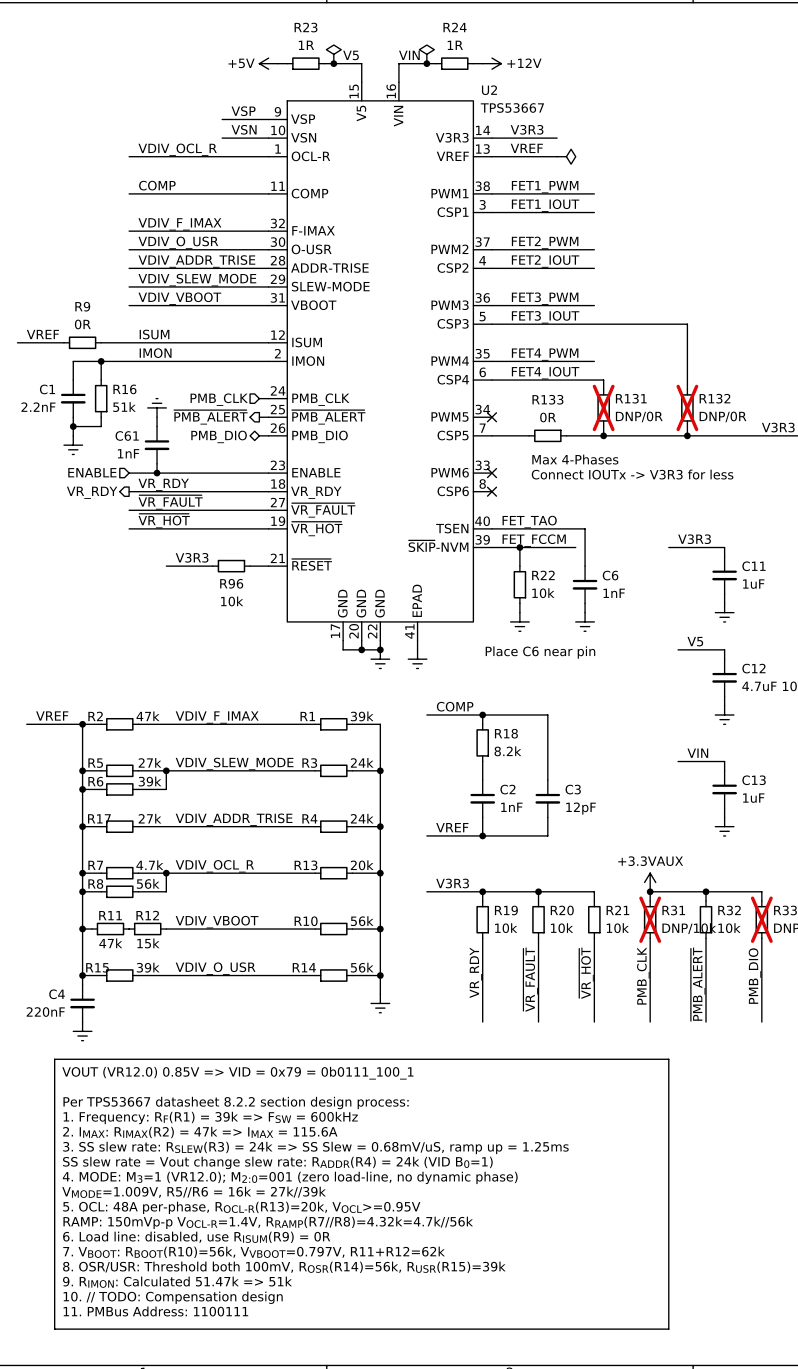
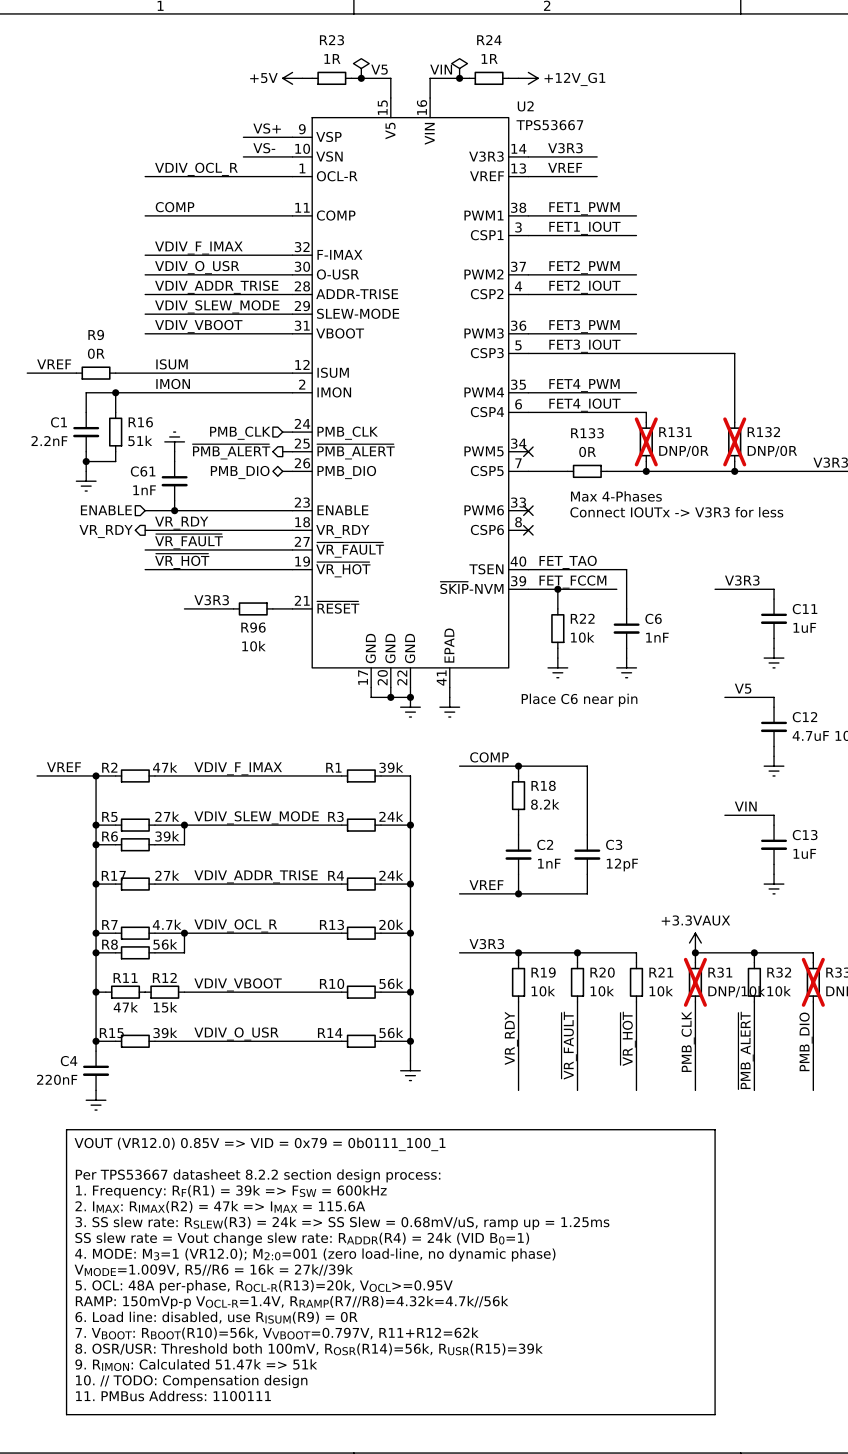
power symbol: +12V (491, 63) -> +12V_G1 (528, 78)
label: VSP (243, 111) -> VS+ (267, 128)
label: VSN (244, 129) -> VS- (264, 148)
power symbol: (566, 156) -> none

